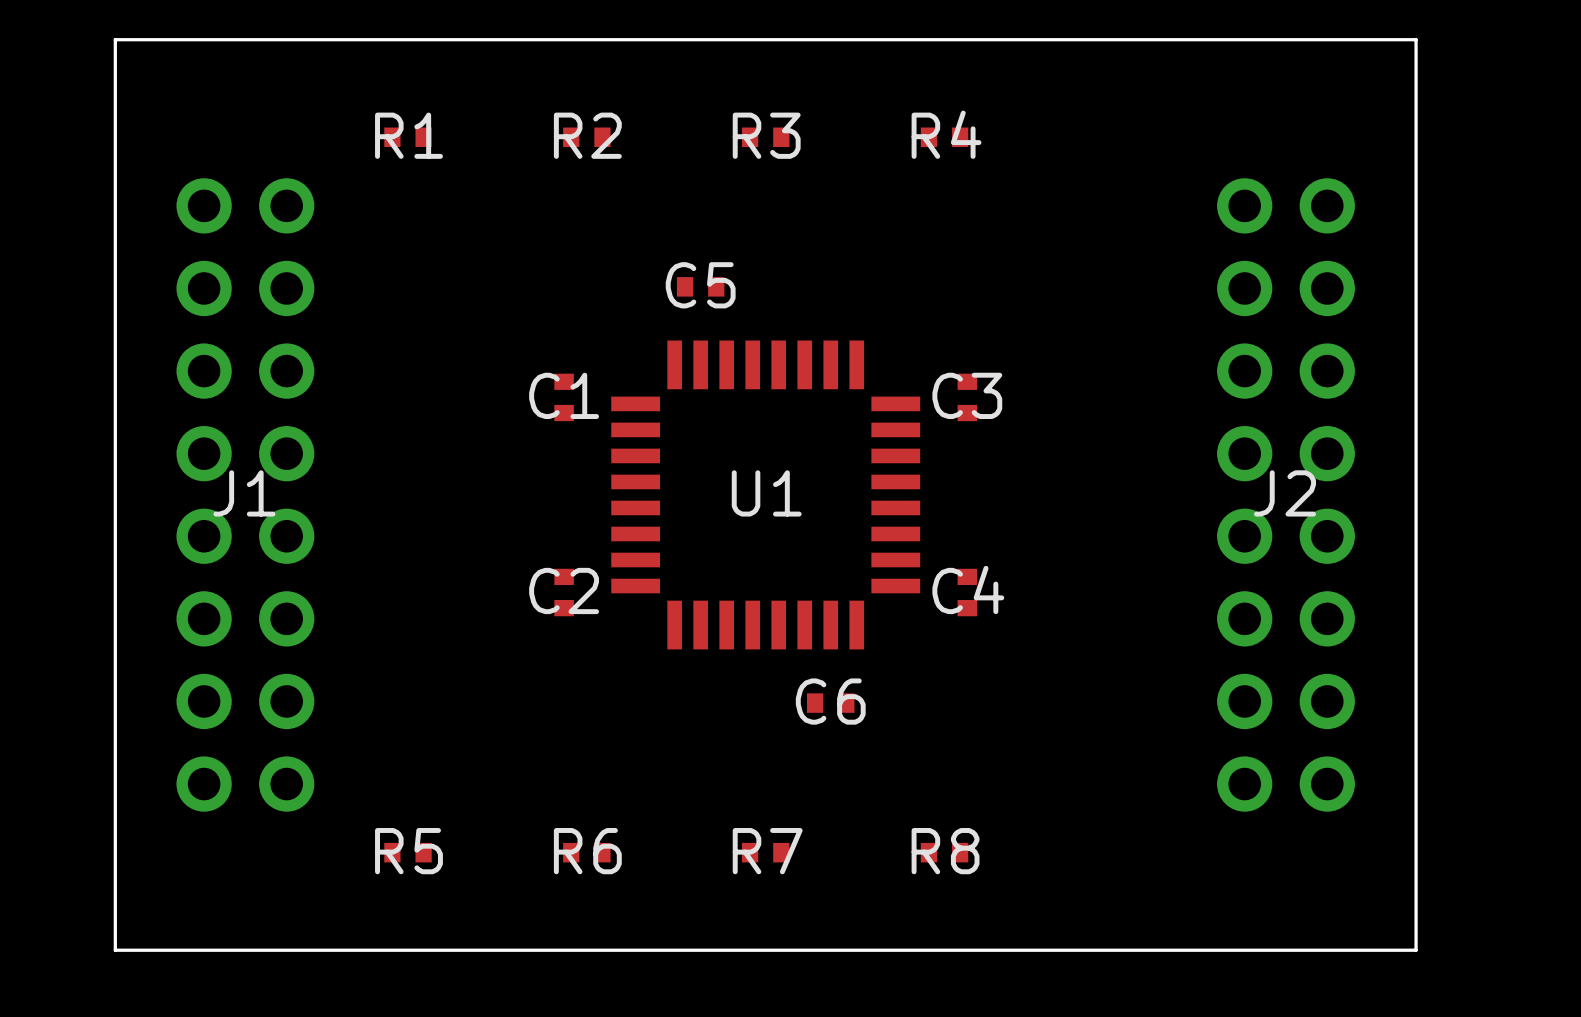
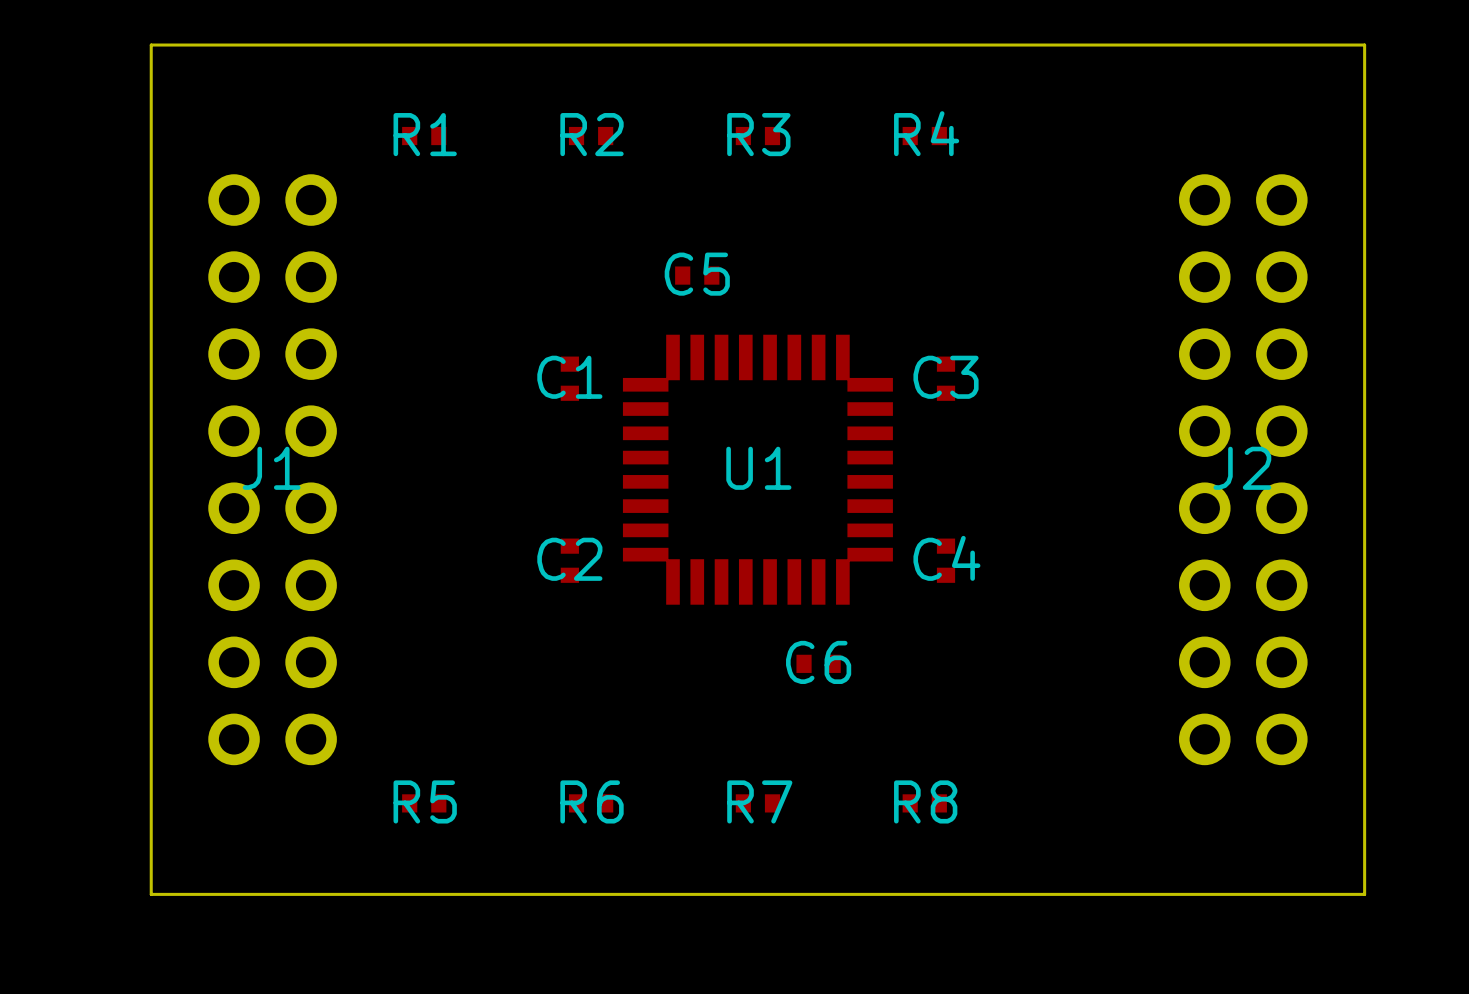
U1 footprint: [611, 340, 921, 650] -> [622, 334, 893, 605]

